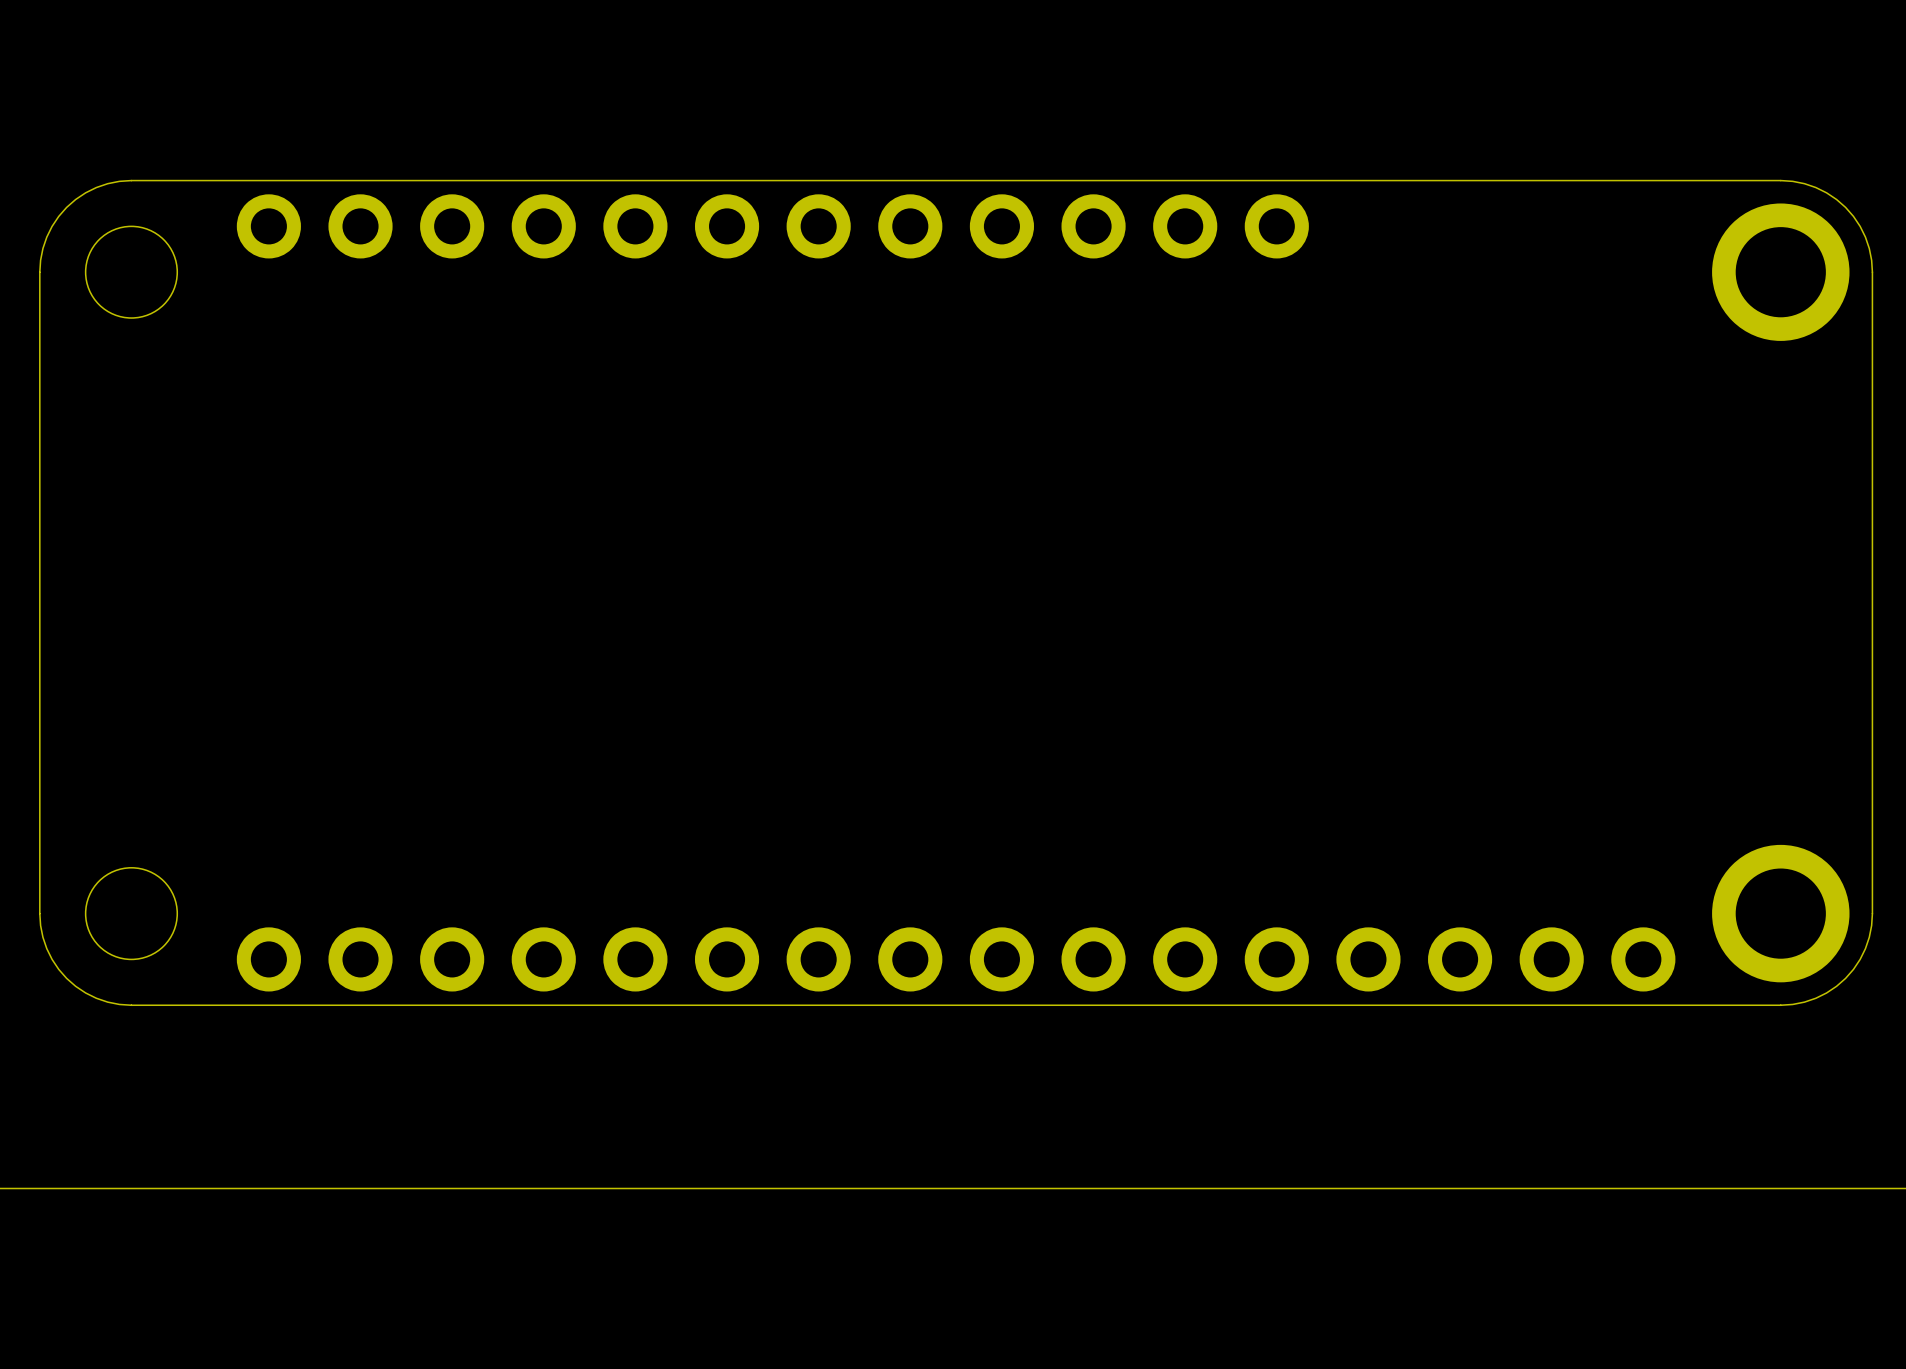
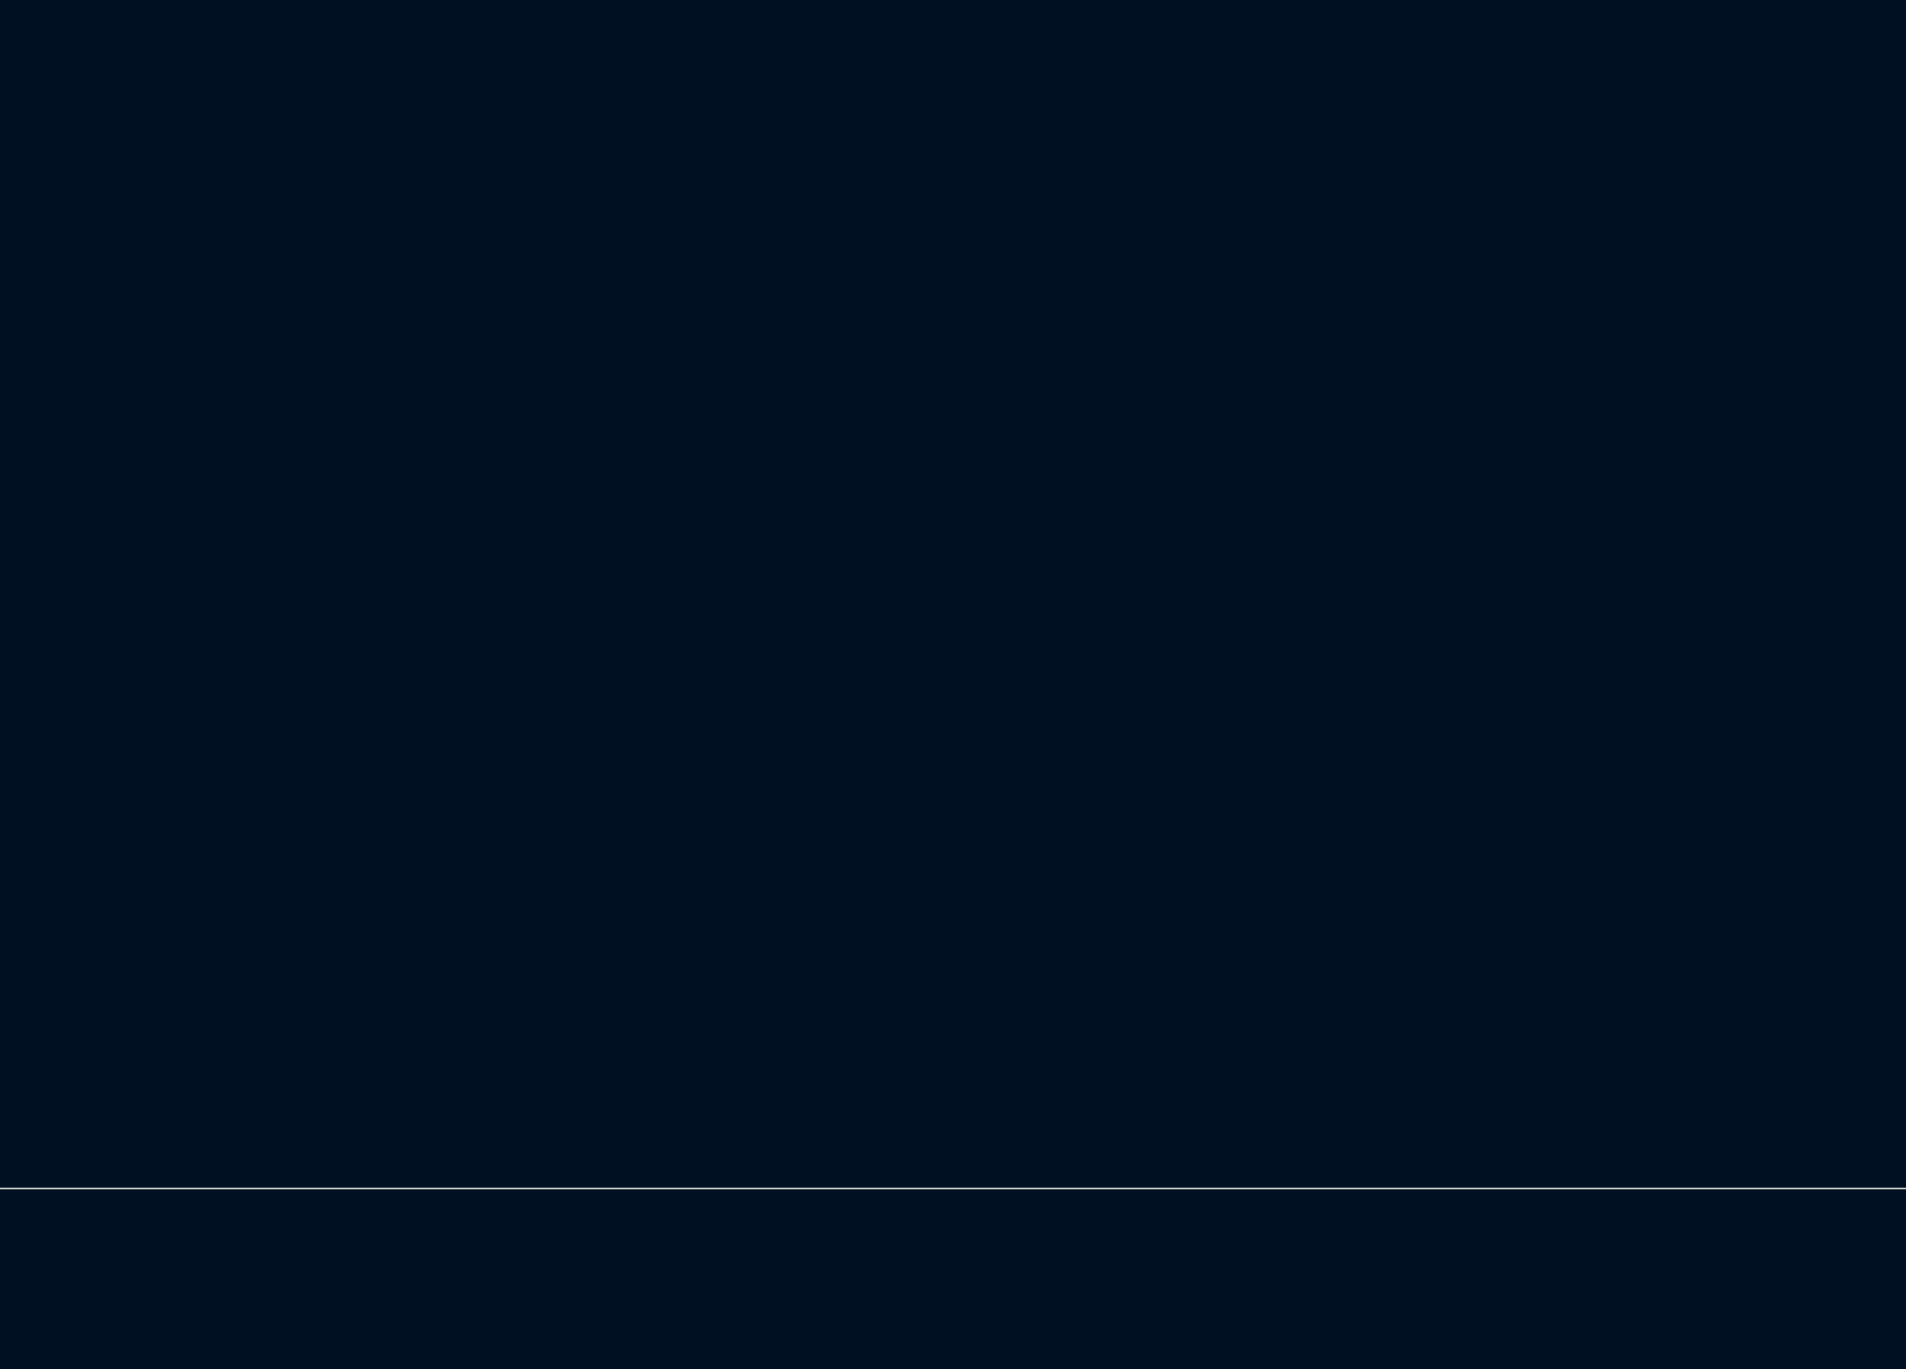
part: (956, 592) -> none

